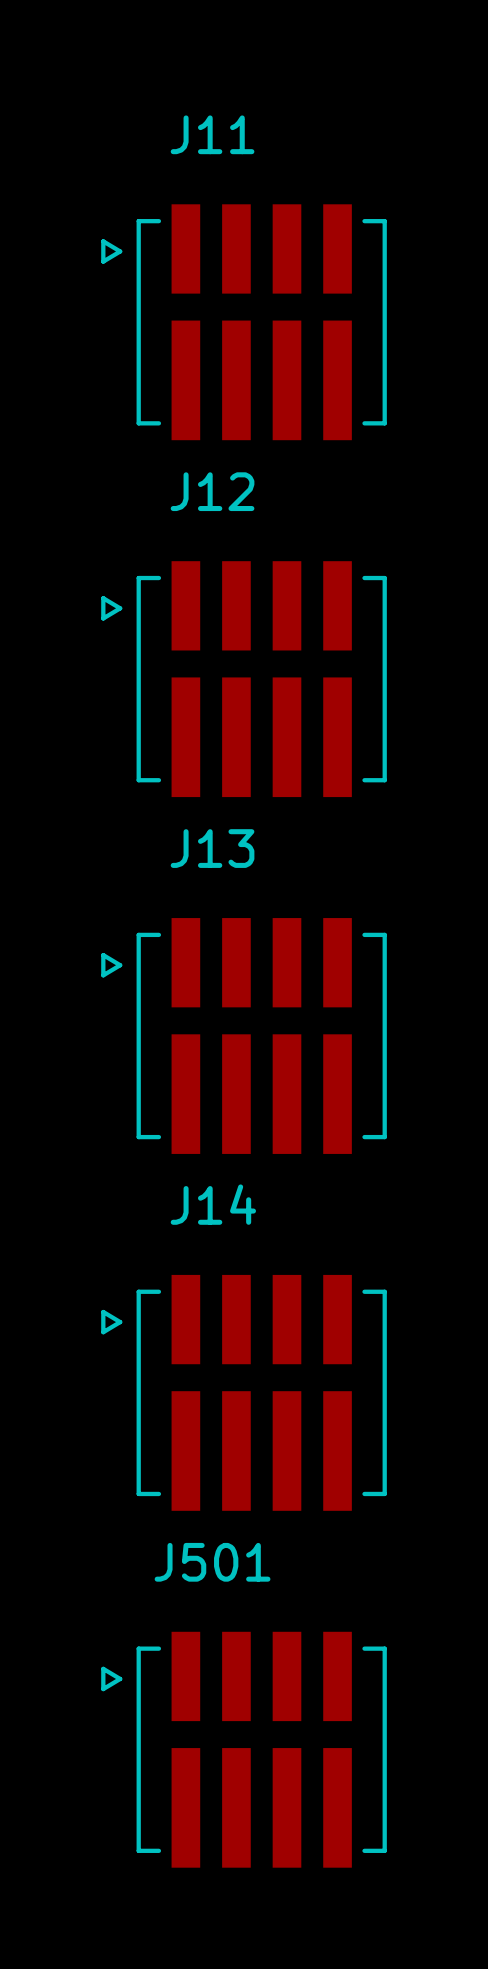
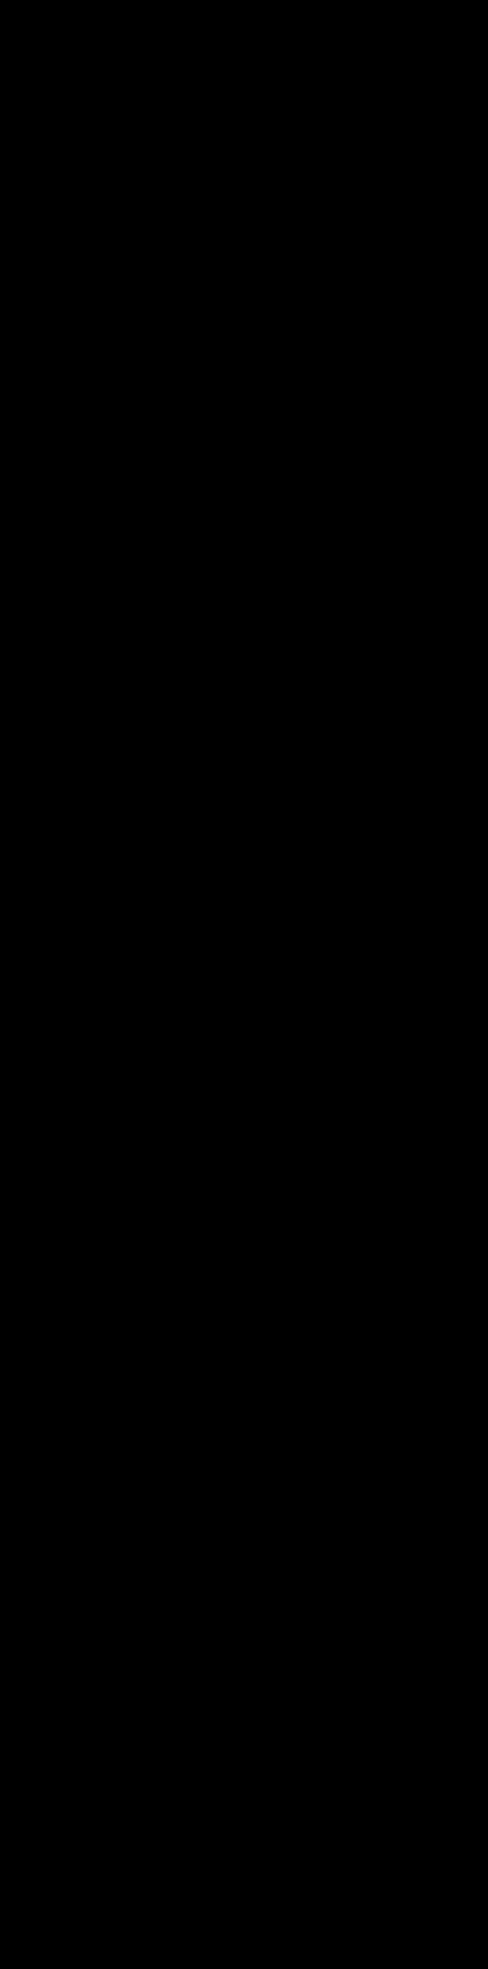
J11: (244, 322) -> none
J12: (244, 679) -> none
J13: (244, 1036) -> none
J14: (244, 1392) -> none
J501: (244, 1749) -> none

